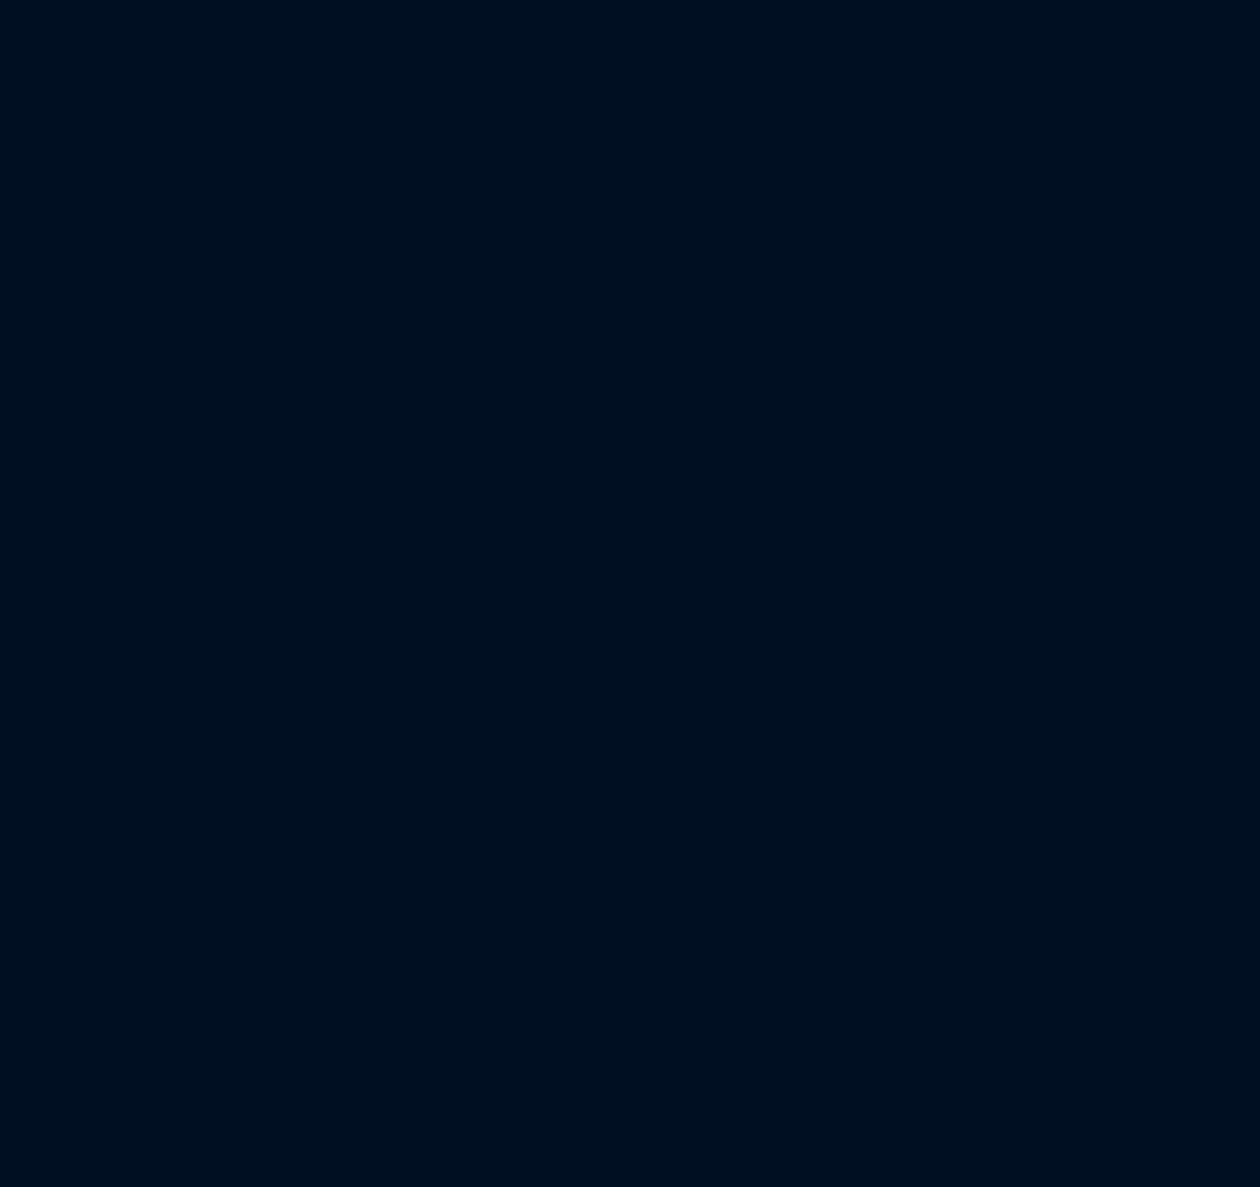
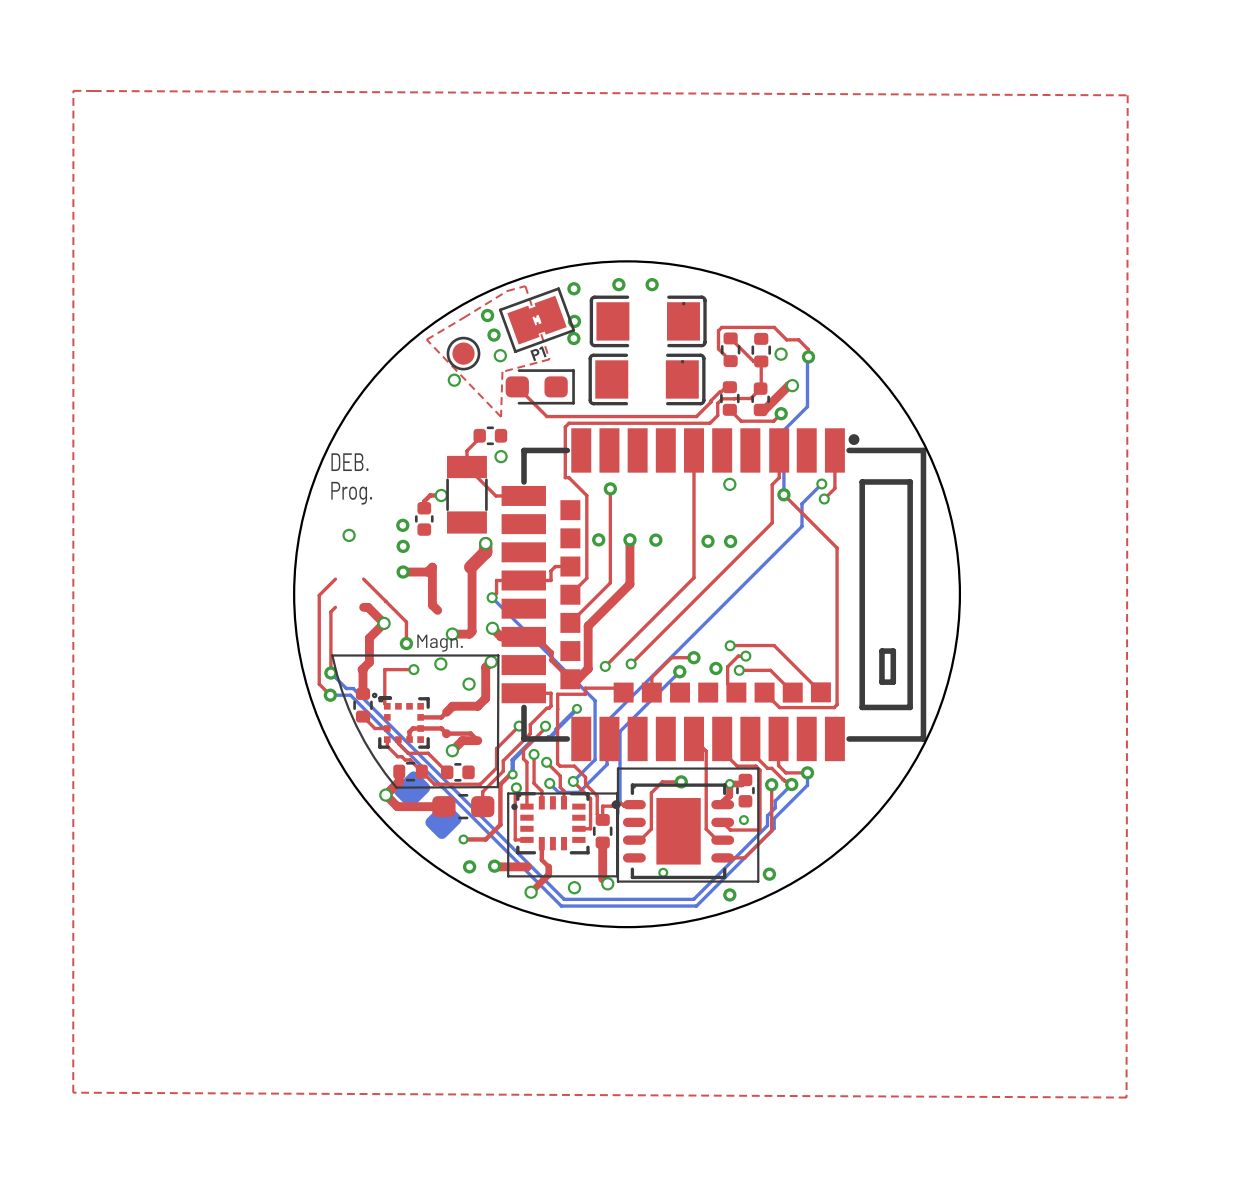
top zone outline: none -> (73, 90) (73, 1092) (1126, 1097) (1127, 95) (73, 90)
round board edge: none -> [293, 260, 962, 929]
via: none -> (618, 284)
via: none -> (652, 284)
top zone outline: none -> (525, 286) (507, 291) (426, 339) (501, 416) (502, 371) (549, 359) (525, 286)
via: none -> (573, 288)
via: none -> (487, 315)
part: none -> (537, 320)
via: none -> (574, 321)
part: none -> (648, 321)
via: none -> (494, 335)
via: none -> (573, 338)
top track: none -> (730, 338) (753, 361) (761, 361) (761, 388) (750, 398) (734, 398)
part: none -> (730, 349)
part: none -> (761, 350)
text: none -> P1 (538, 353)
part: none -> (463, 353)
via: none -> (781, 354)
via: none -> (500, 355)
top track: none -> (808, 356) (808, 349) (798, 339) (786, 339) (774, 327) (721, 327) (718, 330) (718, 348) (730, 361)
bottom track: none -> (808, 356) (807, 406) (783, 430) (783, 494)
via: none -> (808, 356)
part: none -> (647, 379)
via: none -> (454, 380)
top track: none -> (792, 385) (788, 385) (764, 409) (760, 409)
via: none -> (792, 385)
top track: none -> (517, 386) (546, 416) (696, 416) (719, 392) (725, 387) (729, 387)
part: none -> (540, 386)
part: none -> (729, 398)
top track: none -> (734, 398) (722, 398) (717, 403) (717, 415) (710, 423) (569, 423) (565, 427) (565, 477) (568, 477) (586, 495) (586, 578) (570, 594)
part: none -> (760, 399)
top track: none -> (729, 409) (741, 421) (773, 421) (781, 413)
via: none -> (781, 413)
top track: none -> (479, 435) (479, 438) (466, 450) (466, 467) (495, 495) (523, 495)
part: none -> (490, 435)
top track: none -> (693, 450) (693, 577) (605, 666)
top track: none -> (779, 450) (779, 477) (772, 484) (772, 522) (631, 663)
top track: none -> (834, 450) (834, 488) (824, 499)
via: none -> (501, 456)
text: none -> DEB. (350, 462)
bottom track: none -> (821, 483) (801, 503) (801, 526) (607, 721) (607, 764) (579, 792) (558, 792) (549, 783)
via: none -> (821, 483)
via: none -> (729, 484)
top track: none -> (610, 488) (610, 582) (570, 622)
via: none -> (610, 488)
text: none -> Prog. (351, 493)
part: none -> (466, 494)
top track: none -> (783, 494) (837, 547) (837, 704) (834, 707) (779, 707) (764, 692)
via: none -> (783, 494)
top track: none -> (441, 495) (430, 495) (424, 501) (424, 508)
via: none -> (441, 495)
via: none -> (824, 499)
part: none -> (424, 518)
via: none -> (402, 525)
via: none -> (349, 535)
via: none -> (598, 539)
top track: none -> (629, 539) (629, 584) (588, 626) (588, 668) (577, 679) (570, 679) (551, 660) (551, 652) (535, 636) (501, 636) (492, 628)
via: none -> (629, 539)
via: none -> (655, 540)
via: none -> (708, 541)
via: none -> (730, 541)
top track: none -> (485, 543) (485, 552) (470, 567) (472, 631) (469, 634) (452, 634)
via: none -> (485, 543)
via: none -> (403, 546)
top track: none -> (570, 566) (555, 566) (551, 570) (551, 580) (496, 580) (496, 593) (492, 597)
top track: none -> (403, 572) (427, 572) (432, 567) (432, 605) (437, 610)
via: none -> (403, 572)
top track: none -> (335, 579) (319, 595) (319, 684) (330, 695)
top track: none -> (363, 579) (406, 621) (406, 643)
part: none -> (713, 594)
bottom track: none -> (492, 597) (595, 700) (595, 759) (573, 781)
via: none -> (492, 597)
top track: none -> (335, 607) (330, 611) (330, 673)
top track: none -> (363, 607) (368, 607) (384, 623) (369, 638) (369, 662) (362, 669) (363, 693)
via: none -> (384, 623)
via: none -> (492, 628)
via: none -> (452, 634)
via: none -> (406, 643)
text: none -> Magn. (440, 643)
top track: none -> (730, 645) (774, 645) (820, 692)
via: none -> (730, 645)
line: none -> (332, 655) (498, 655) (497, 787) (396, 787) (374, 757) (356, 725) (342, 691) (336, 673) (332, 655)
top track: none -> (745, 656) (738, 656) (727, 666) (727, 683) (736, 692)
via: none -> (745, 656)
top track: none -> (693, 657) (671, 657) (651, 677) (651, 692)
via: none -> (693, 657)
top track: none -> (491, 661) (485, 667) (485, 698) (477, 706) (452, 706) (441, 717) (420, 717)
via: none -> (491, 661)
via: none -> (440, 663)
via: none -> (631, 663)
via: none -> (605, 666)
via: none -> (715, 668)
top track: none -> (413, 669) (384, 669) (384, 703) (387, 706)
via: none -> (413, 669)
top track: none -> (739, 670) (770, 670) (792, 692)
via: none -> (739, 670)
bottom track: none -> (679, 671) (620, 731) (620, 802) (617, 804) (617, 814)
via: none -> (679, 671)
bottom track: none -> (330, 673) (346, 688) (353, 688) (564, 899) (693, 899) (767, 825) (767, 815) (775, 808) (775, 801) (791, 784)
via: none -> (330, 673)
via: none -> (469, 684)
top track: none -> (623, 692) (619, 688) (585, 688) (585, 694) (557, 694) (557, 763) (559, 766) (574, 766) (585, 777) (585, 784) (597, 795) (597, 814) (602, 819) (602, 806) (611, 806) (613, 804) (621, 804) (624, 806) (634, 804)
top track: none -> (523, 693) (551, 693) (551, 706) (530, 724) (530, 733) (503, 760) (503, 771) (482, 791) (482, 806)
bottom track: none -> (330, 695) (350, 695) (561, 906) (696, 906) (774, 828) (774, 818) (807, 785) (807, 772)
via: none -> (330, 695)
part: none -> (363, 705)
bottom track: none -> (577, 708) (550, 737) (533, 738) (512, 760) (512, 774)
via: none -> (577, 708)
top track: none -> (363, 716) (374, 728) (387, 728)
part: none -> (400, 720)
top track: none -> (519, 726) (496, 748) (496, 768) (480, 784) (434, 784) (410, 759) (397, 756) (387, 746) (387, 739)
via: none -> (519, 726)
top track: none -> (545, 726) (523, 750) (523, 758) (526, 762) (526, 806)
via: none -> (545, 726)
top track: none -> (693, 738) (706, 751) (706, 829) (717, 840) (722, 840)
top track: none -> (750, 738) (750, 751) (767, 768) (771, 768) (784, 781) (788, 781) (791, 784)
top track: none -> (778, 738) (778, 765) (785, 772) (807, 772)
top track: none -> (398, 739) (398, 743) (408, 753) (428, 753) (447, 771)
top track: none -> (409, 739) (409, 731) (412, 728) (441, 728) (446, 733) (470, 733) (477, 740) (462, 740) (452, 750)
via: none -> (452, 750)
top track: none -> (722, 751) (737, 766) (755, 766) (760, 770) (760, 830) (730, 830) (722, 822)
top track: none -> (534, 754) (534, 783) (541, 791) (541, 802)
via: none -> (534, 754)
top track: none -> (546, 762) (560, 775) (560, 787) (564, 791) (564, 802)
via: none -> (546, 762)
line: none -> (617, 768) (758, 768) (758, 881) (617, 881) (617, 768)
top track: none -> (399, 771) (399, 781) (385, 795) (397, 806) (443, 806)
part: none -> (410, 771)
part: none -> (457, 772)
via: none -> (807, 772)
top track: none -> (512, 774) (510, 774) (500, 784) (500, 824) (485, 839) (463, 839)
via: none -> (512, 774)
top track: none -> (745, 779) (741, 783) (729, 783) (729, 795) (722, 804)
top track: none -> (573, 781) (590, 798) (590, 828) (578, 828)
via: none -> (573, 781)
top track: none -> (681, 781) (662, 781) (651, 792) (651, 829) (640, 840) (634, 840)
via: none -> (681, 781)
via: none -> (549, 783)
via: none -> (729, 783)
top track: none -> (771, 784) (771, 830) (744, 857) (722, 857)
via: none -> (771, 784)
via: none -> (791, 784)
top track: none -> (516, 787) (515, 839) (526, 839)
via: none -> (516, 787)
part: none -> (745, 790)
line: none -> (508, 793) (617, 793) (617, 876) (508, 876) (508, 793)
via: none -> (385, 795)
part: none -> (427, 805)
part: none -> (463, 806)
via: none -> (743, 820)
part: none -> (550, 823)
part: none -> (602, 831)
part: none -> (672, 831)
via: none -> (463, 839)
top track: none -> (602, 842) (602, 878)
top track: none -> (541, 843) (541, 859) (548, 866) (548, 874) (531, 892)
via: none -> (469, 866)
top track: none -> (494, 866) (527, 866)
via: none -> (494, 866)
via: none -> (663, 872)
via: none -> (769, 874)
via: none -> (607, 883)
via: none -> (574, 887)
via: none -> (531, 892)
via: none -> (729, 894)

